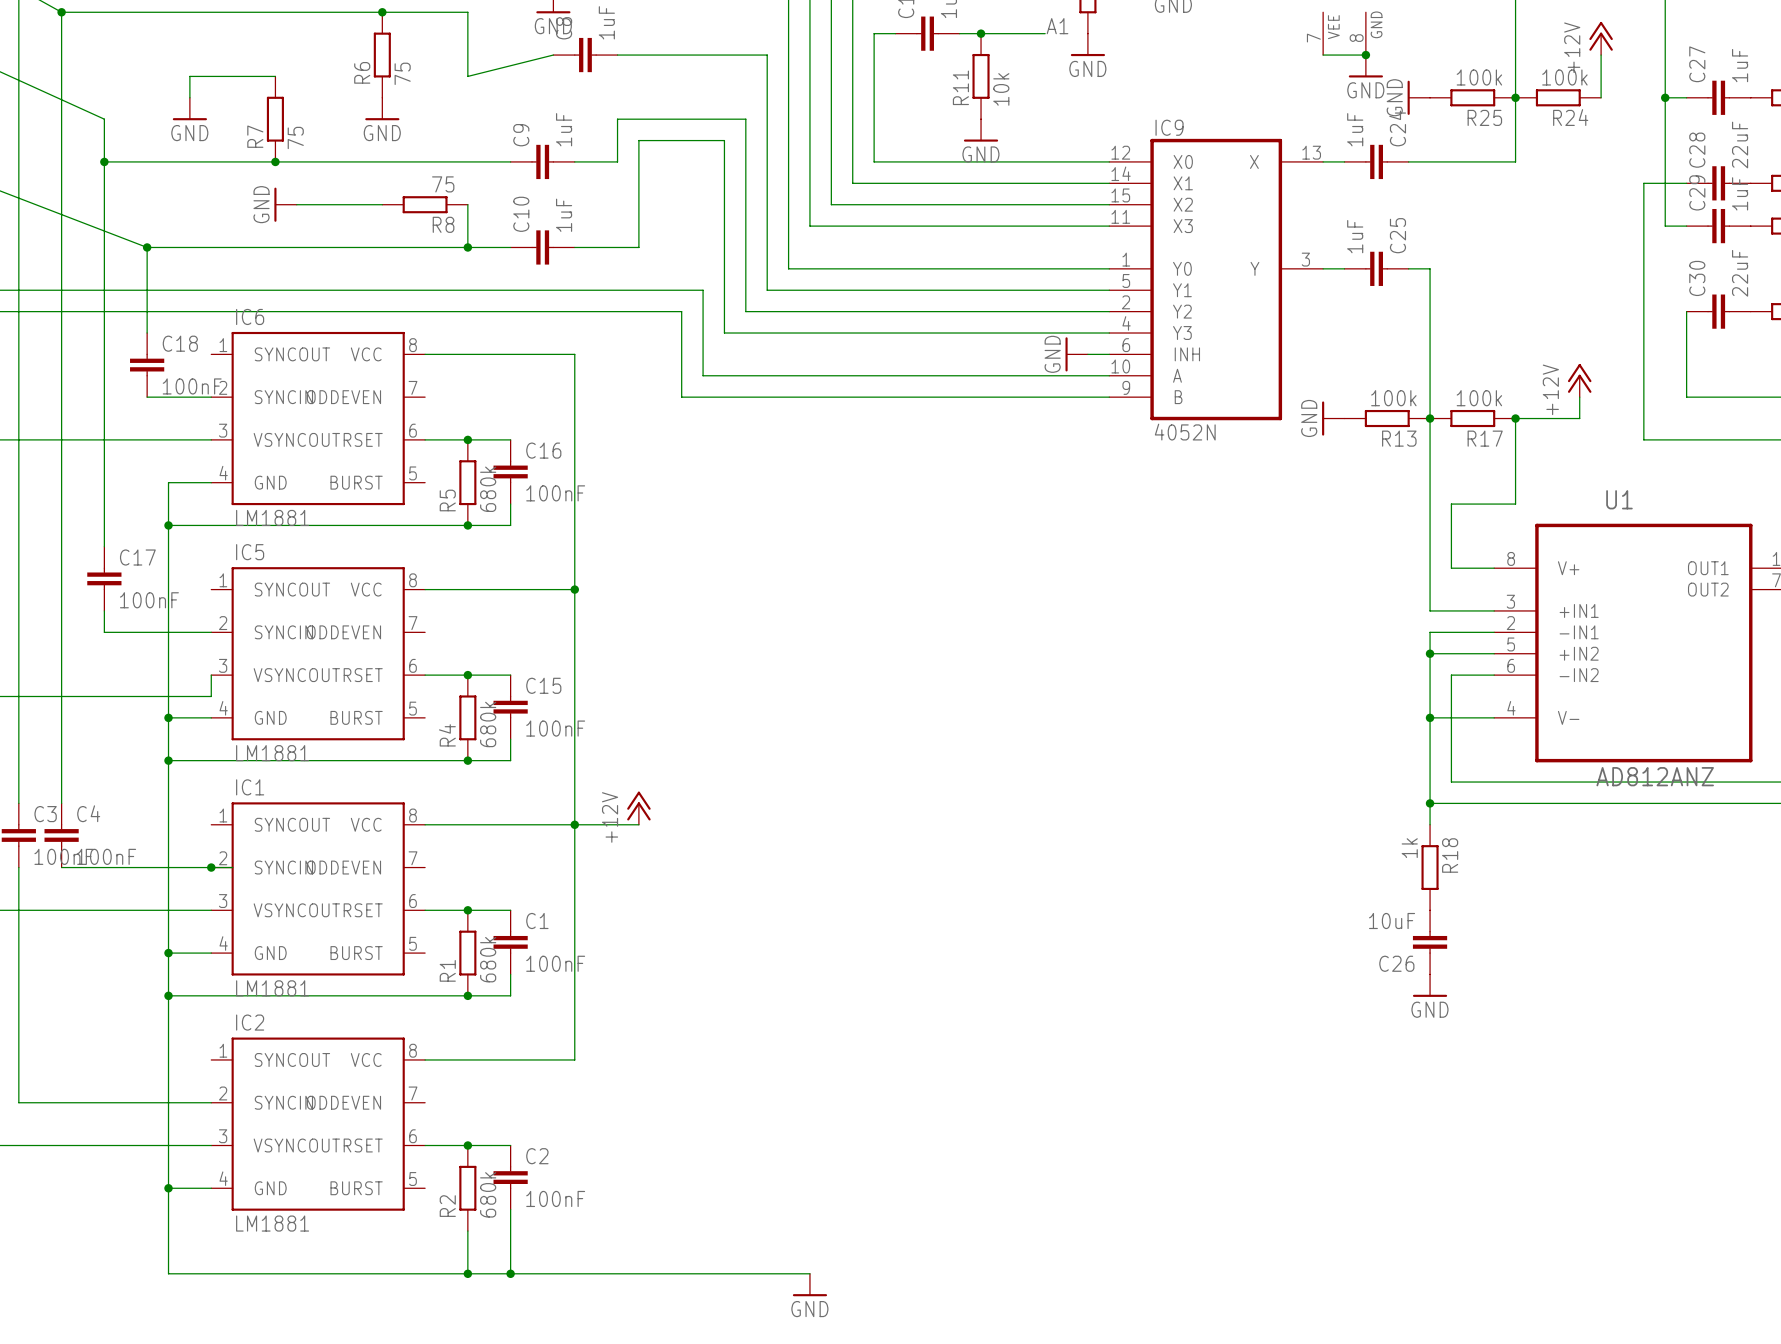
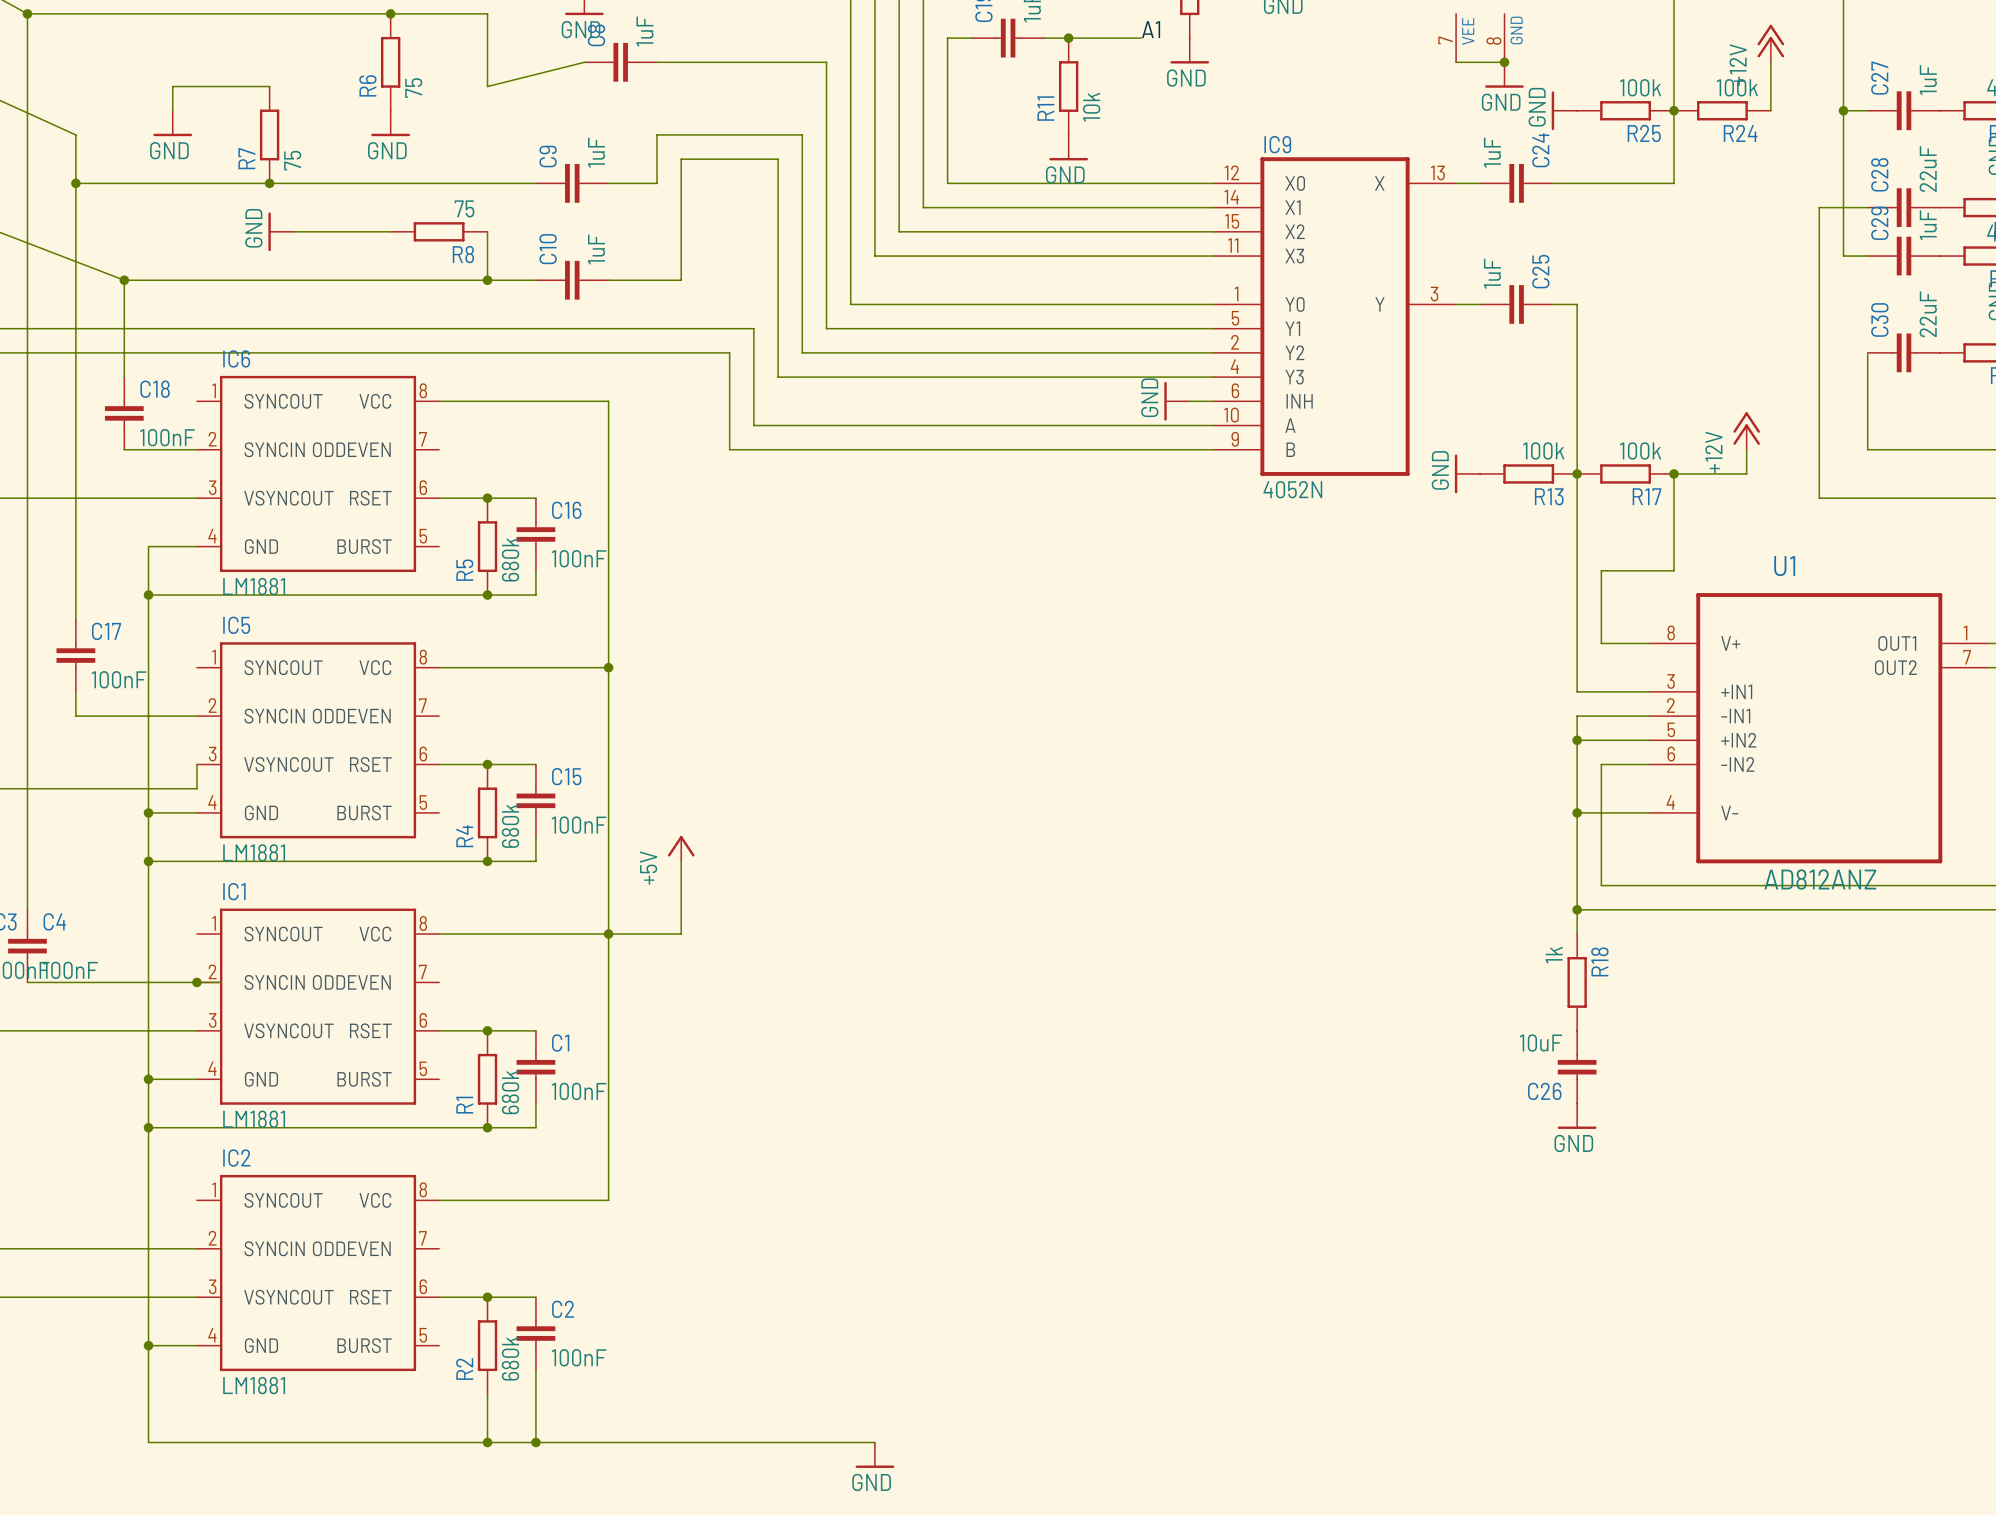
power symbol: none -> +5V (681, 848)
wire: none -> (681, 861) (681, 934)
power symbol: +12V (638, 808) -> none

